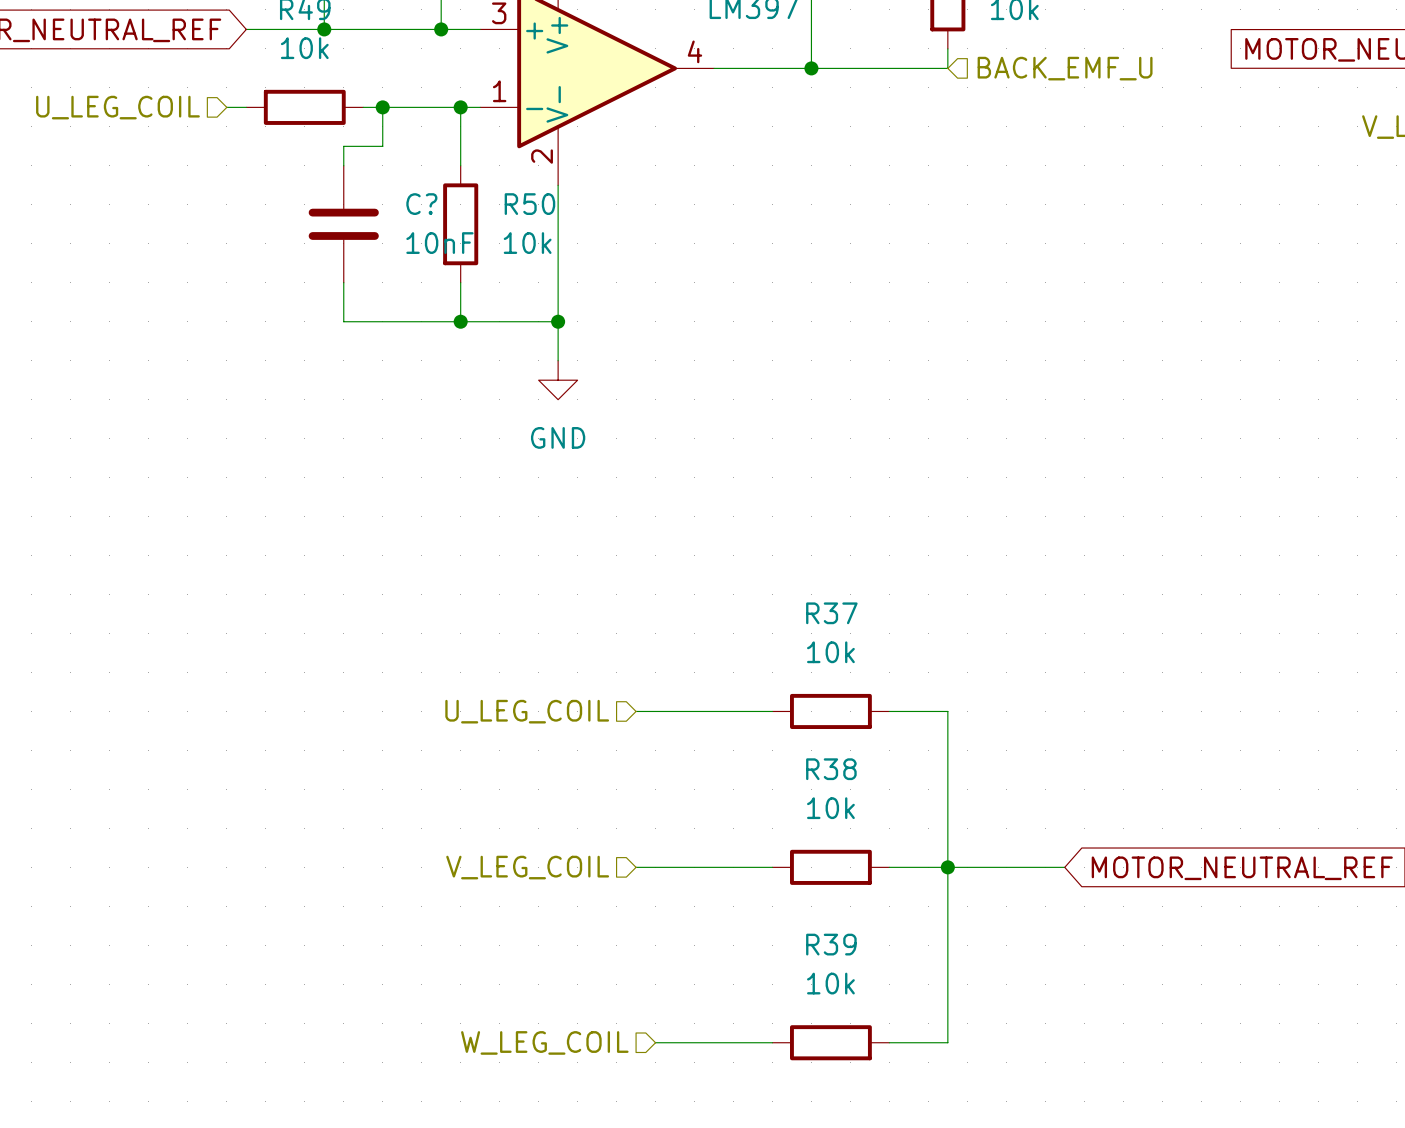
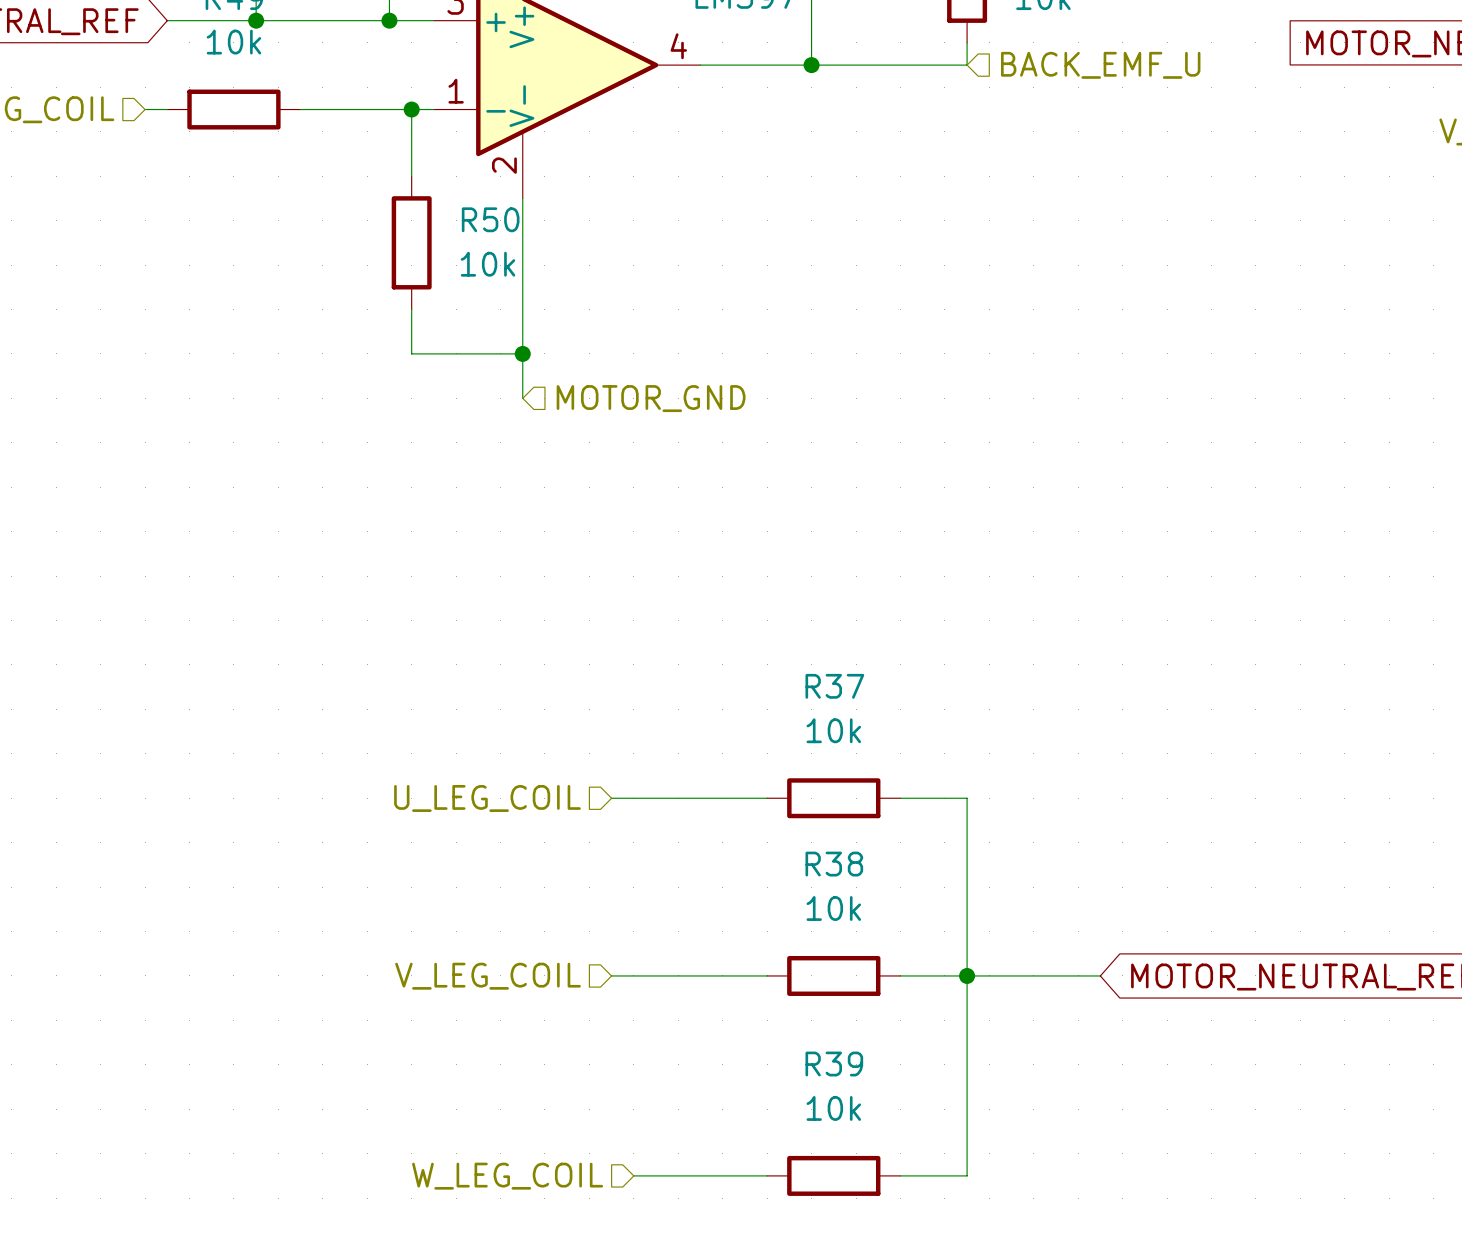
wire: (382, 107) (382, 146) (343, 146) (343, 165) -> none
junction: (382, 107) -> none
C?: 10nF (343, 224) -> none
wire: (343, 282) (343, 321) (460, 321) -> none
junction: (460, 321) -> none
hierarchical label: none -> MOTOR_GND (651, 398)
power symbol: GND (558, 380) -> none

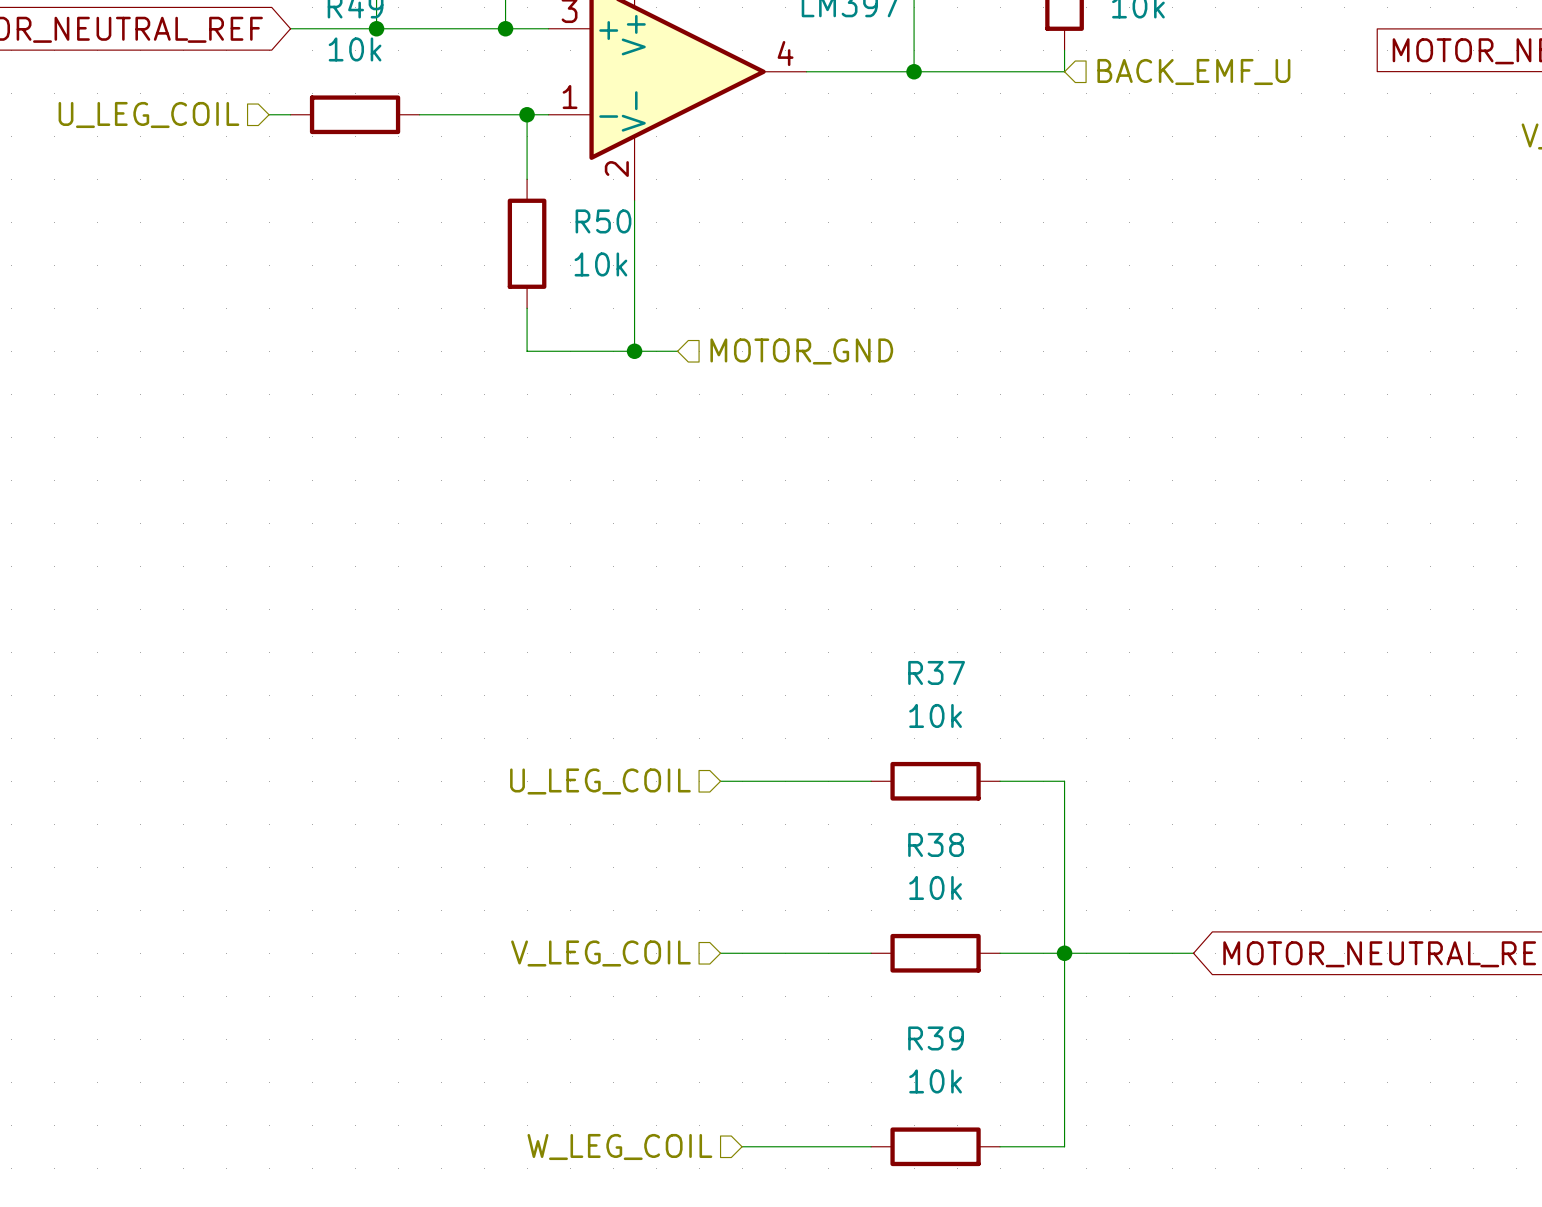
wire: (522, 353) (522, 398) -> (634, 351) (677, 351)
hierarchical label position: MOTOR_GND (651, 398) -> MOTOR_GND (801, 351)

